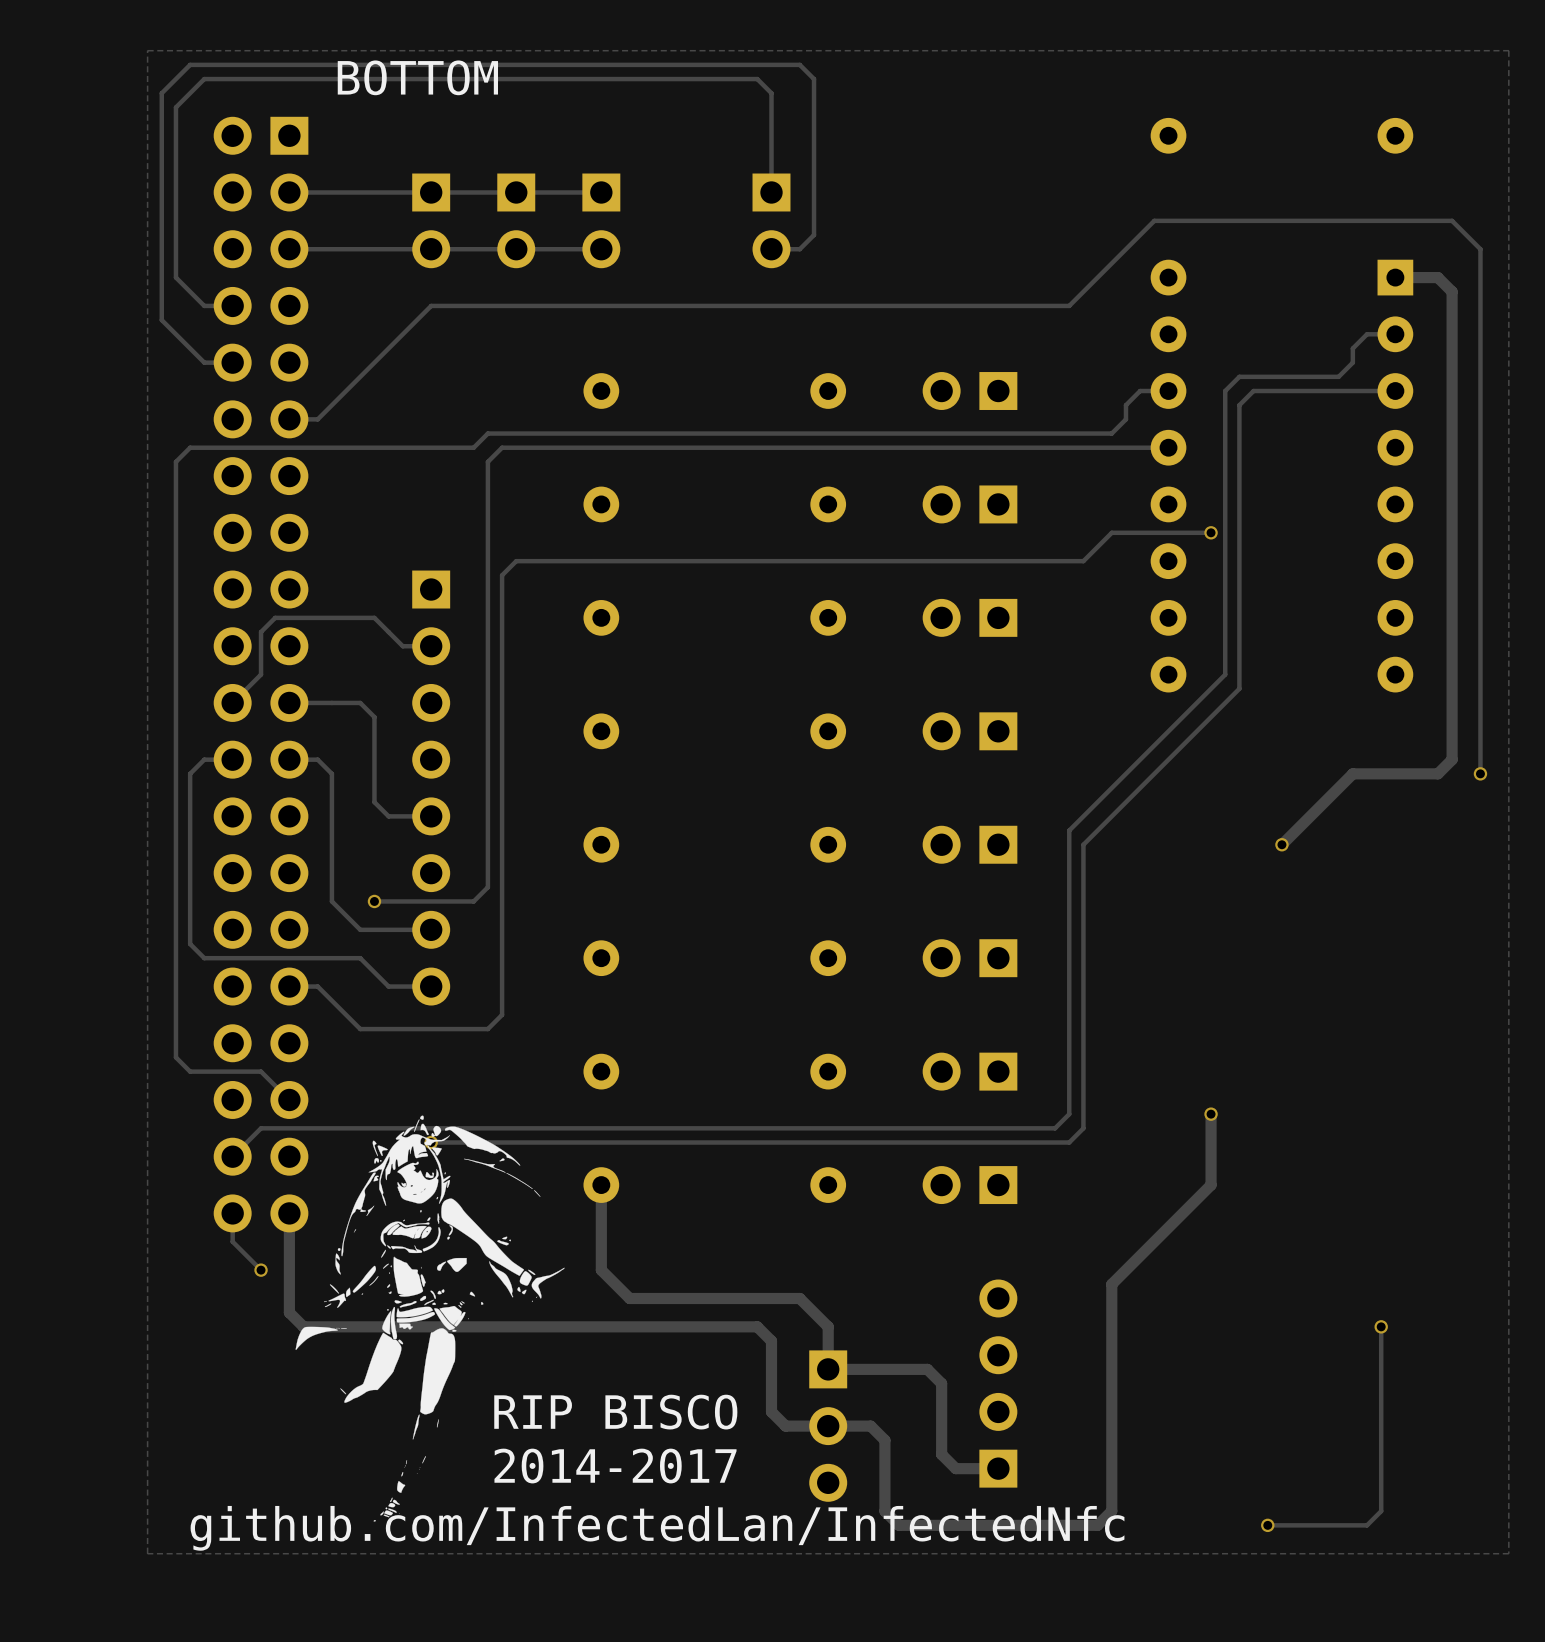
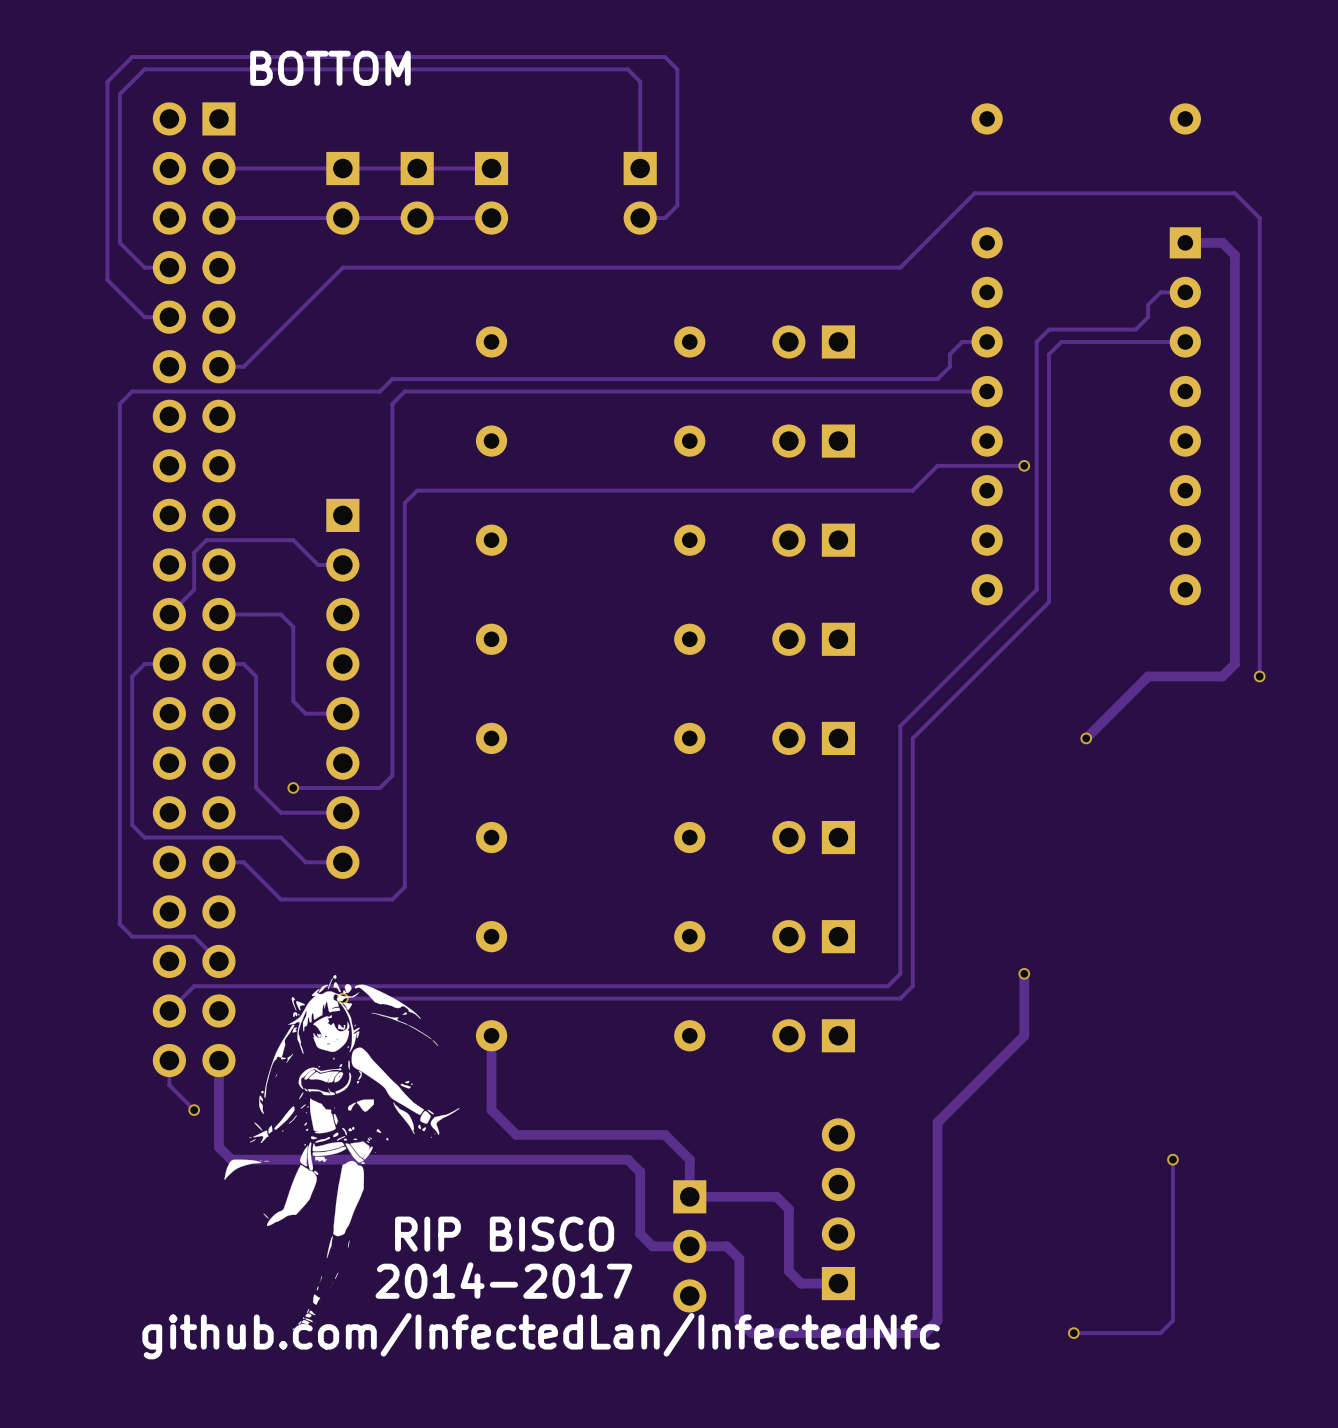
zone outline: (1508, 50) (147, 50) (147, 1553) (1508, 1553) (1508, 50) -> none

